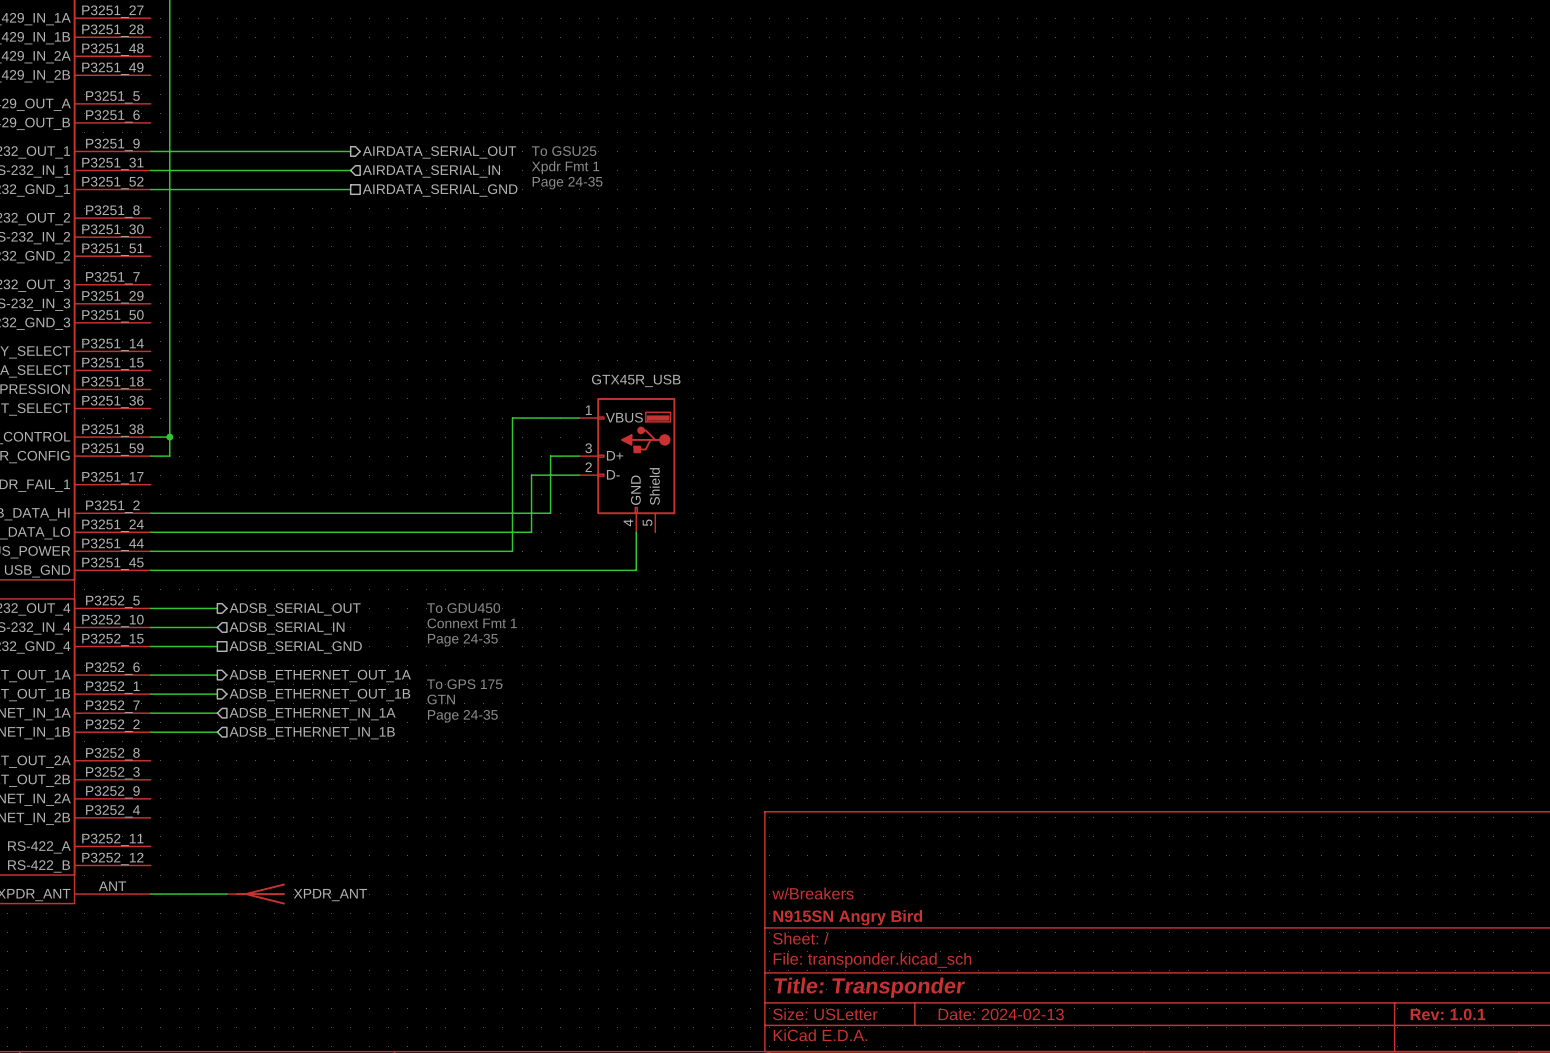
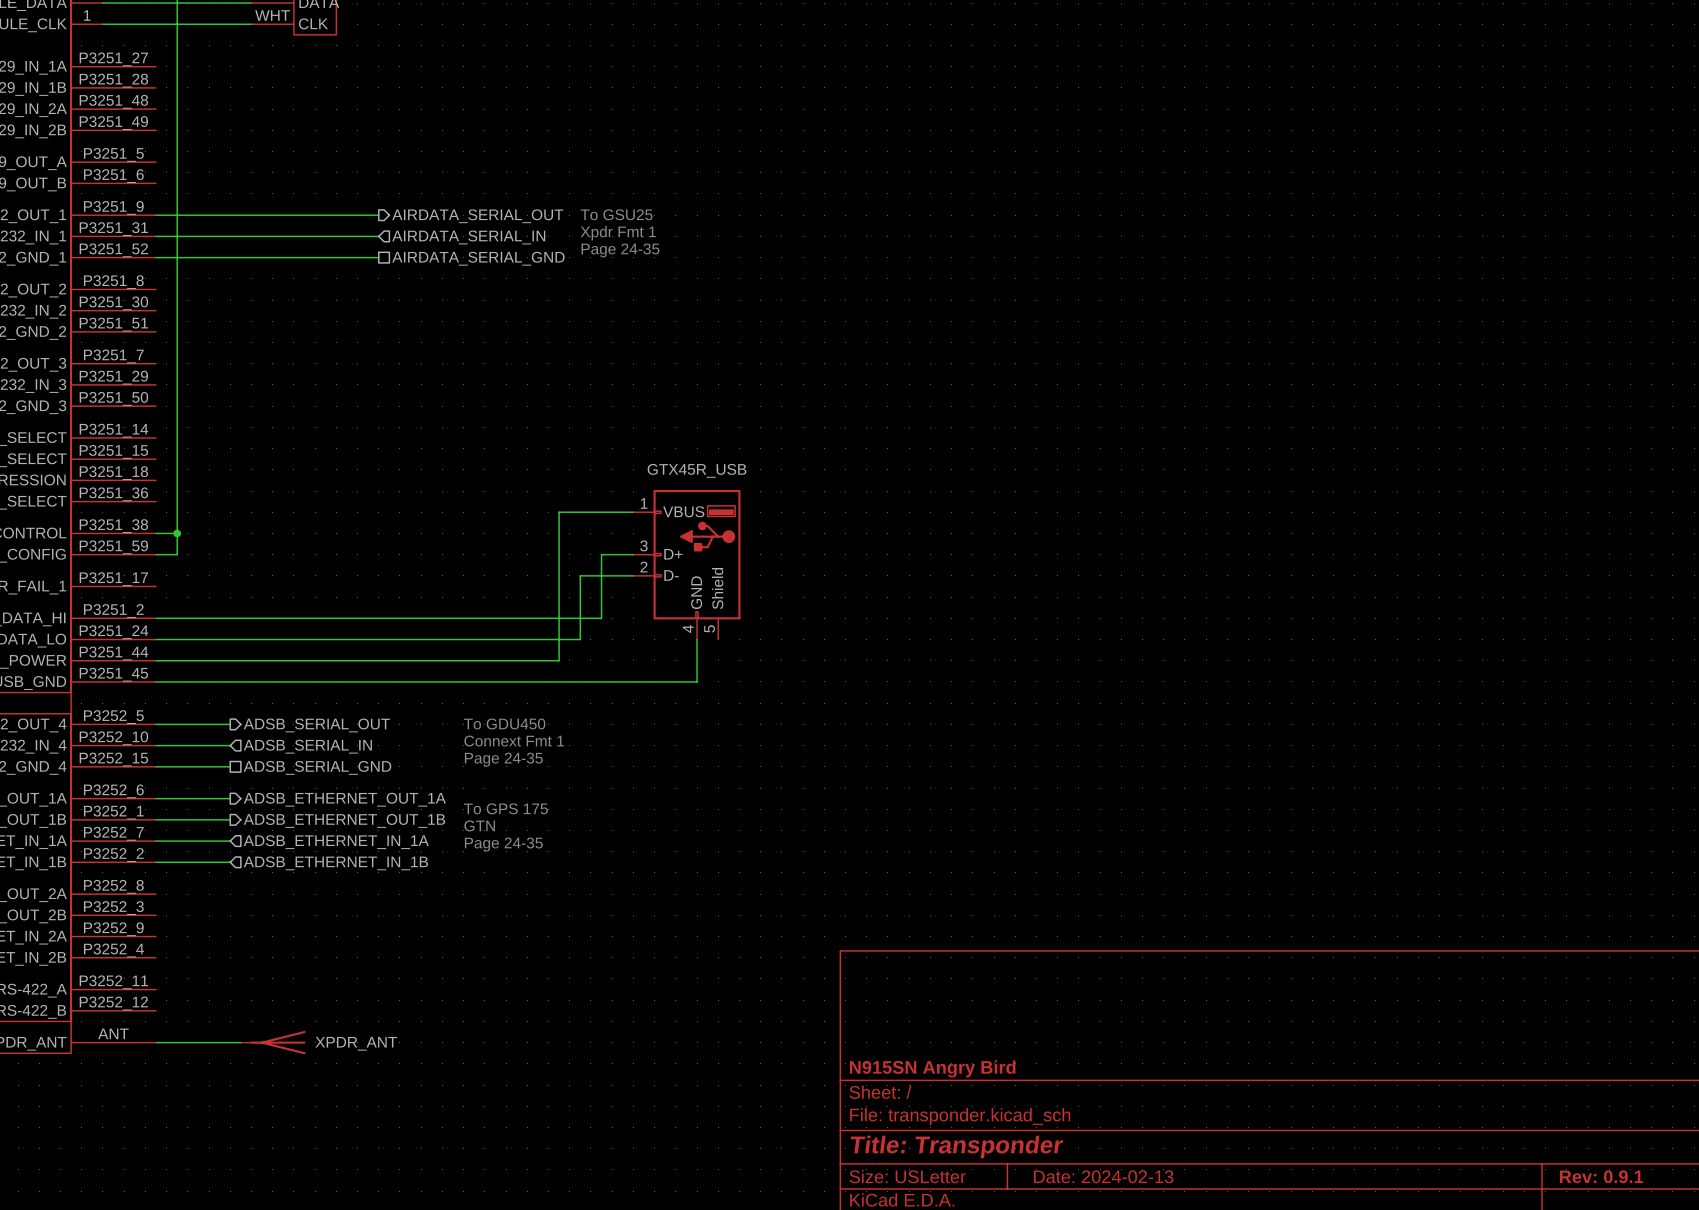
title block: w/Breakers (812, 893) -> none
title block: Rev: 1.0.1 (1448, 1014) -> Rev: 0.9.1 (1601, 1176)

